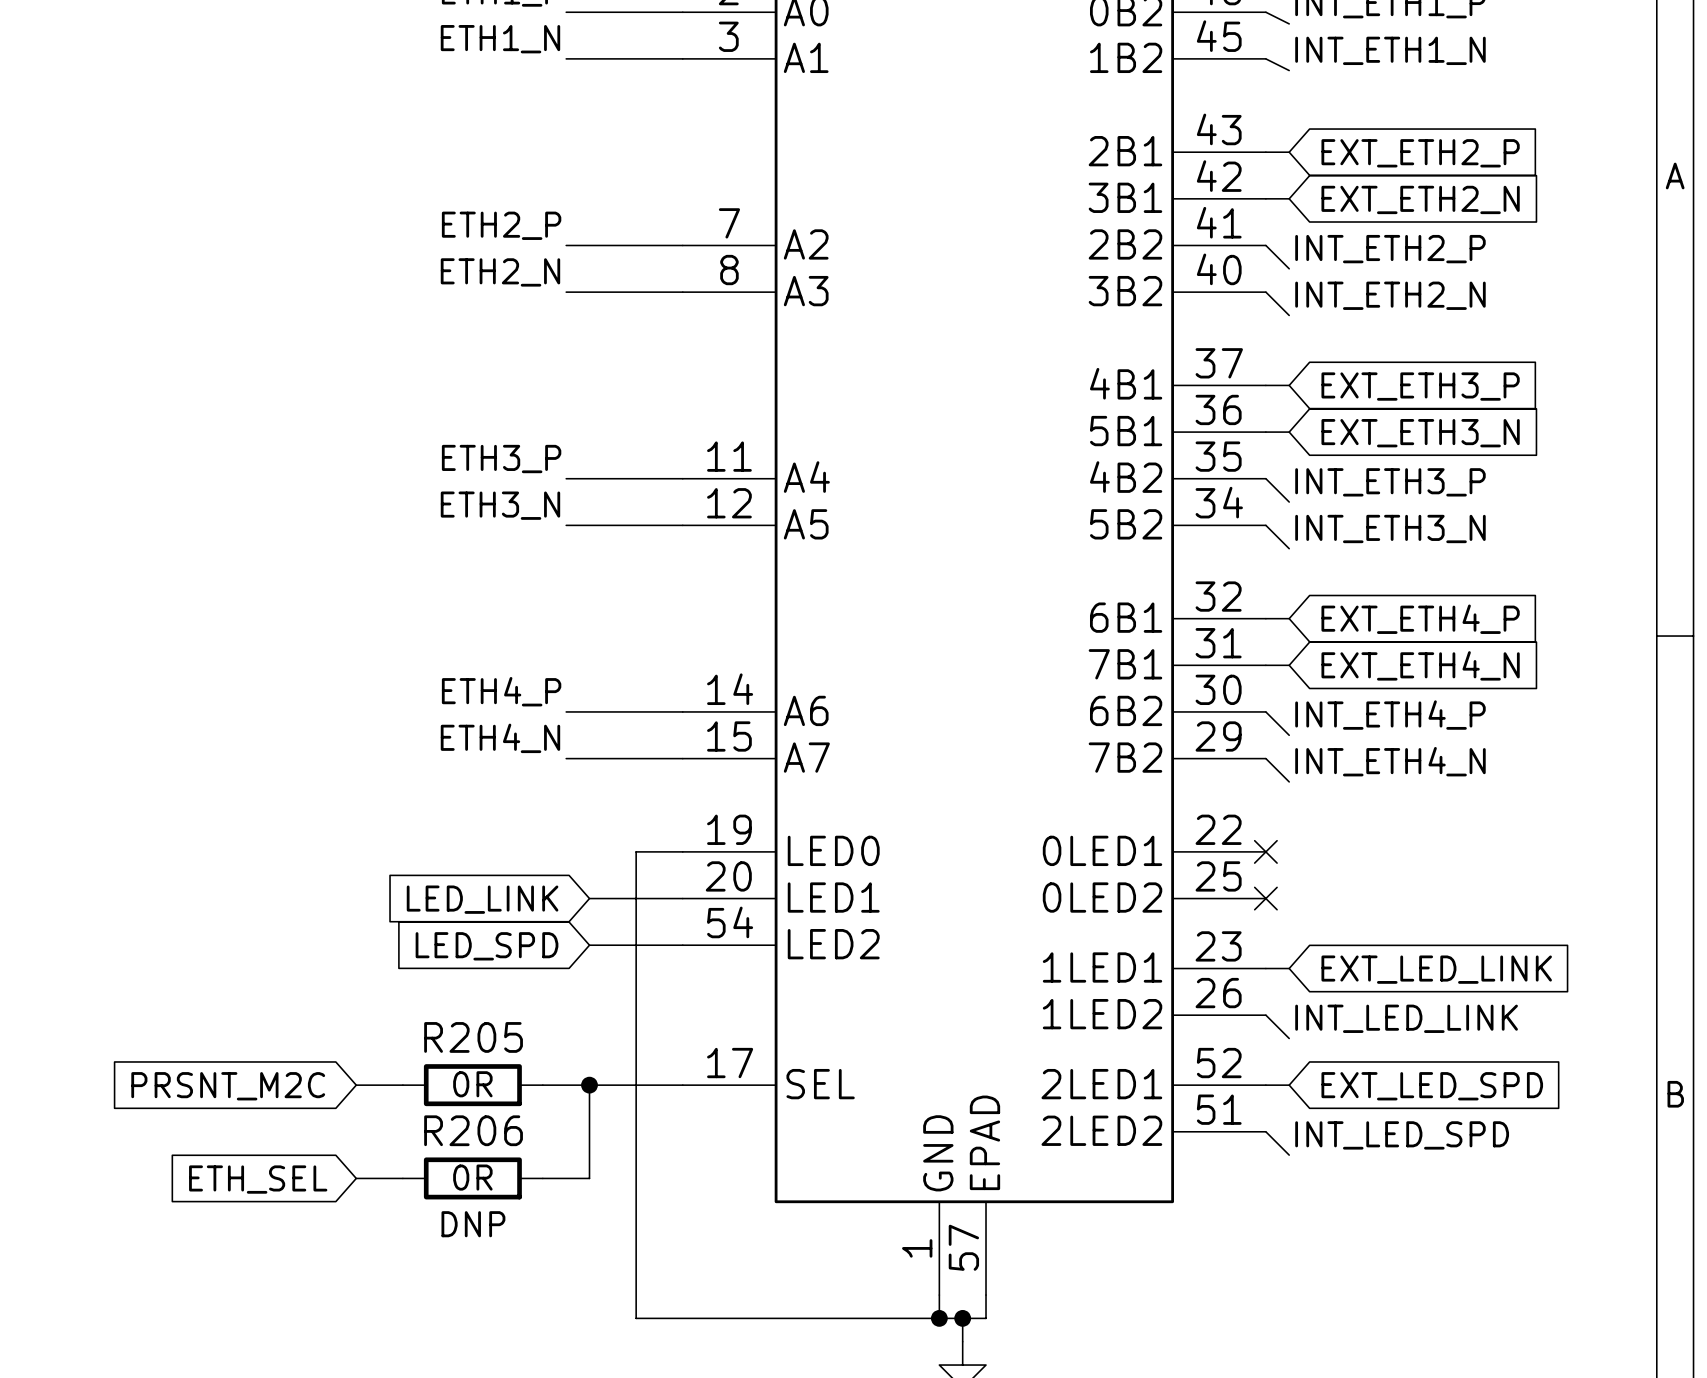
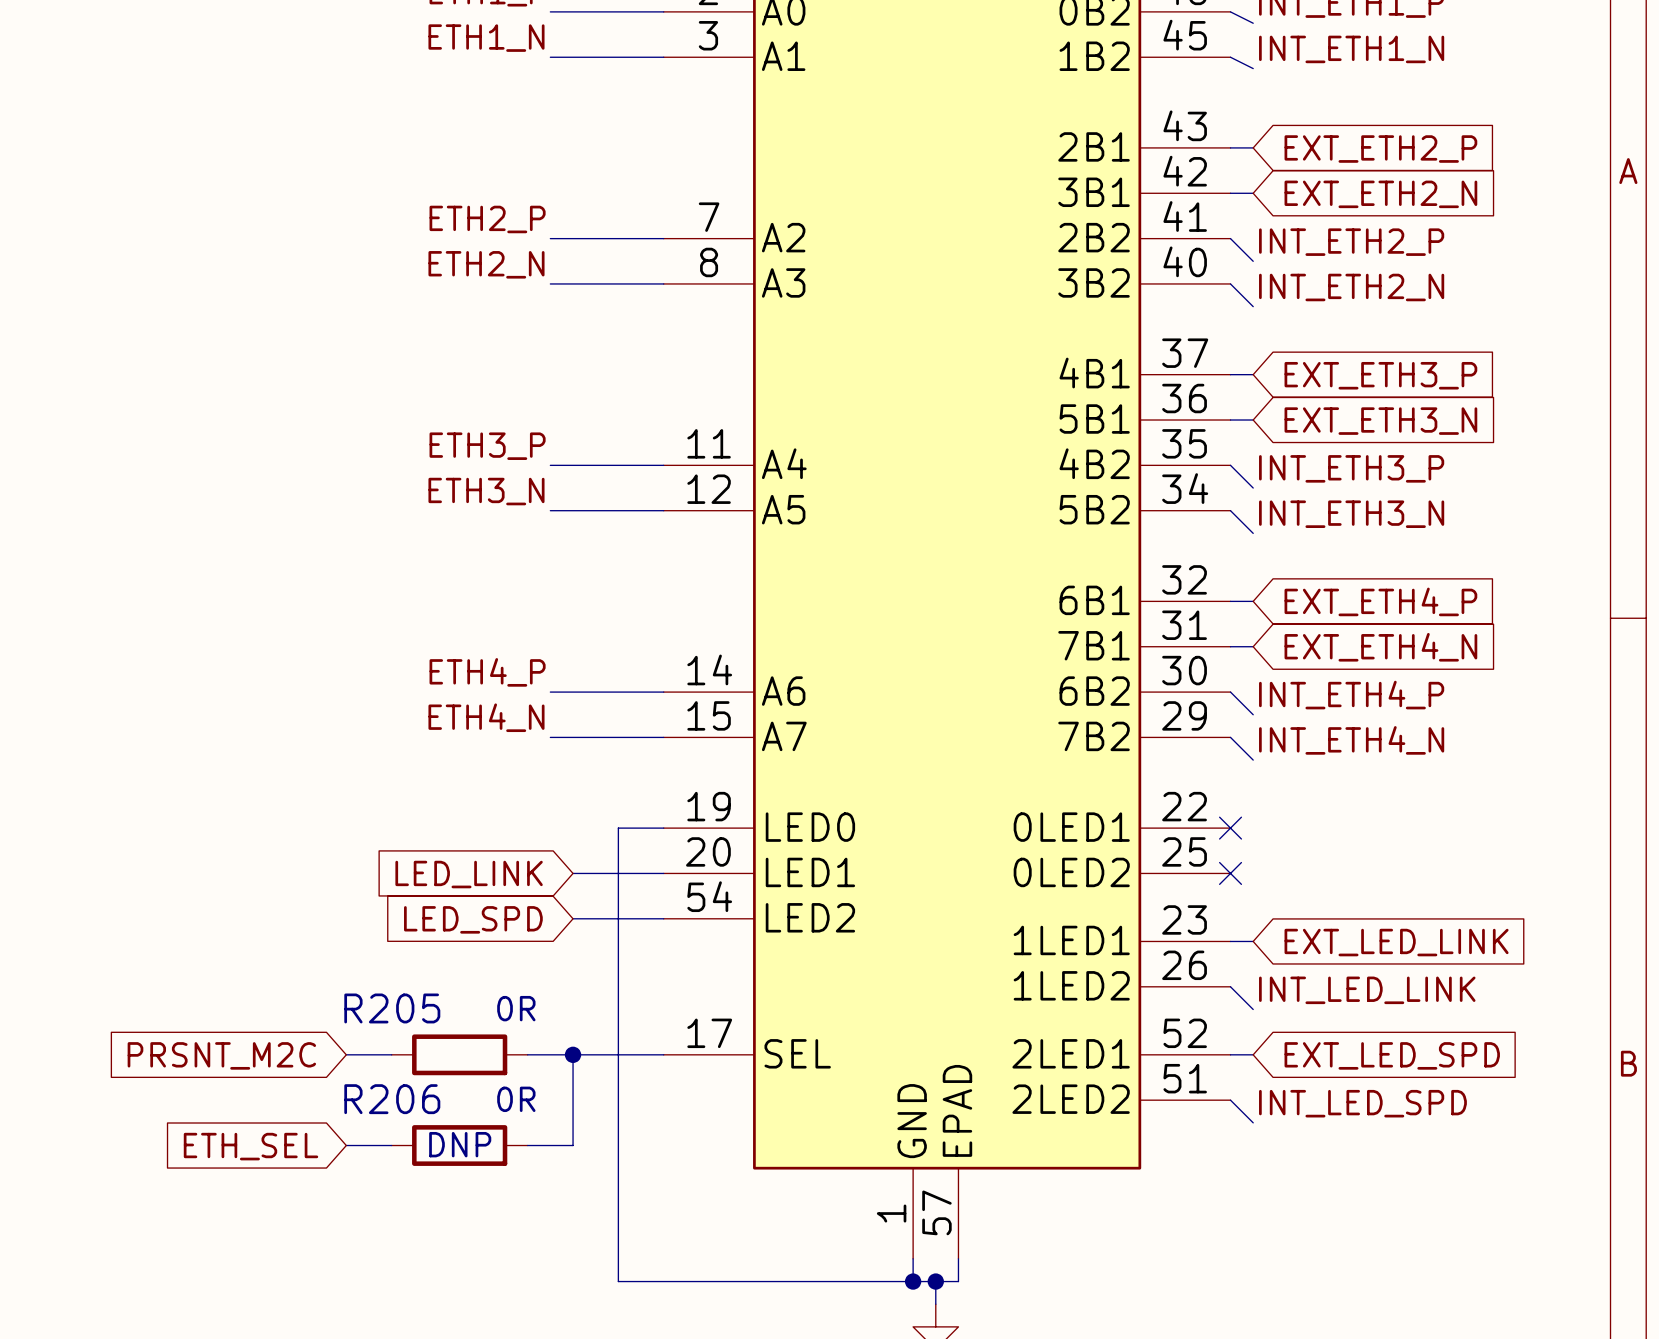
R205 name position: R205 (473, 1037) -> R205 (392, 1008)
R205 text position: 0R (472, 1084) -> 0R (516, 1008)
R206 name position: R206 (473, 1130) -> R206 (392, 1099)
R206 text position: 0R (472, 1177) -> 0R (516, 1099)
R206 text position: DNP (473, 1224) -> DNP (460, 1144)

